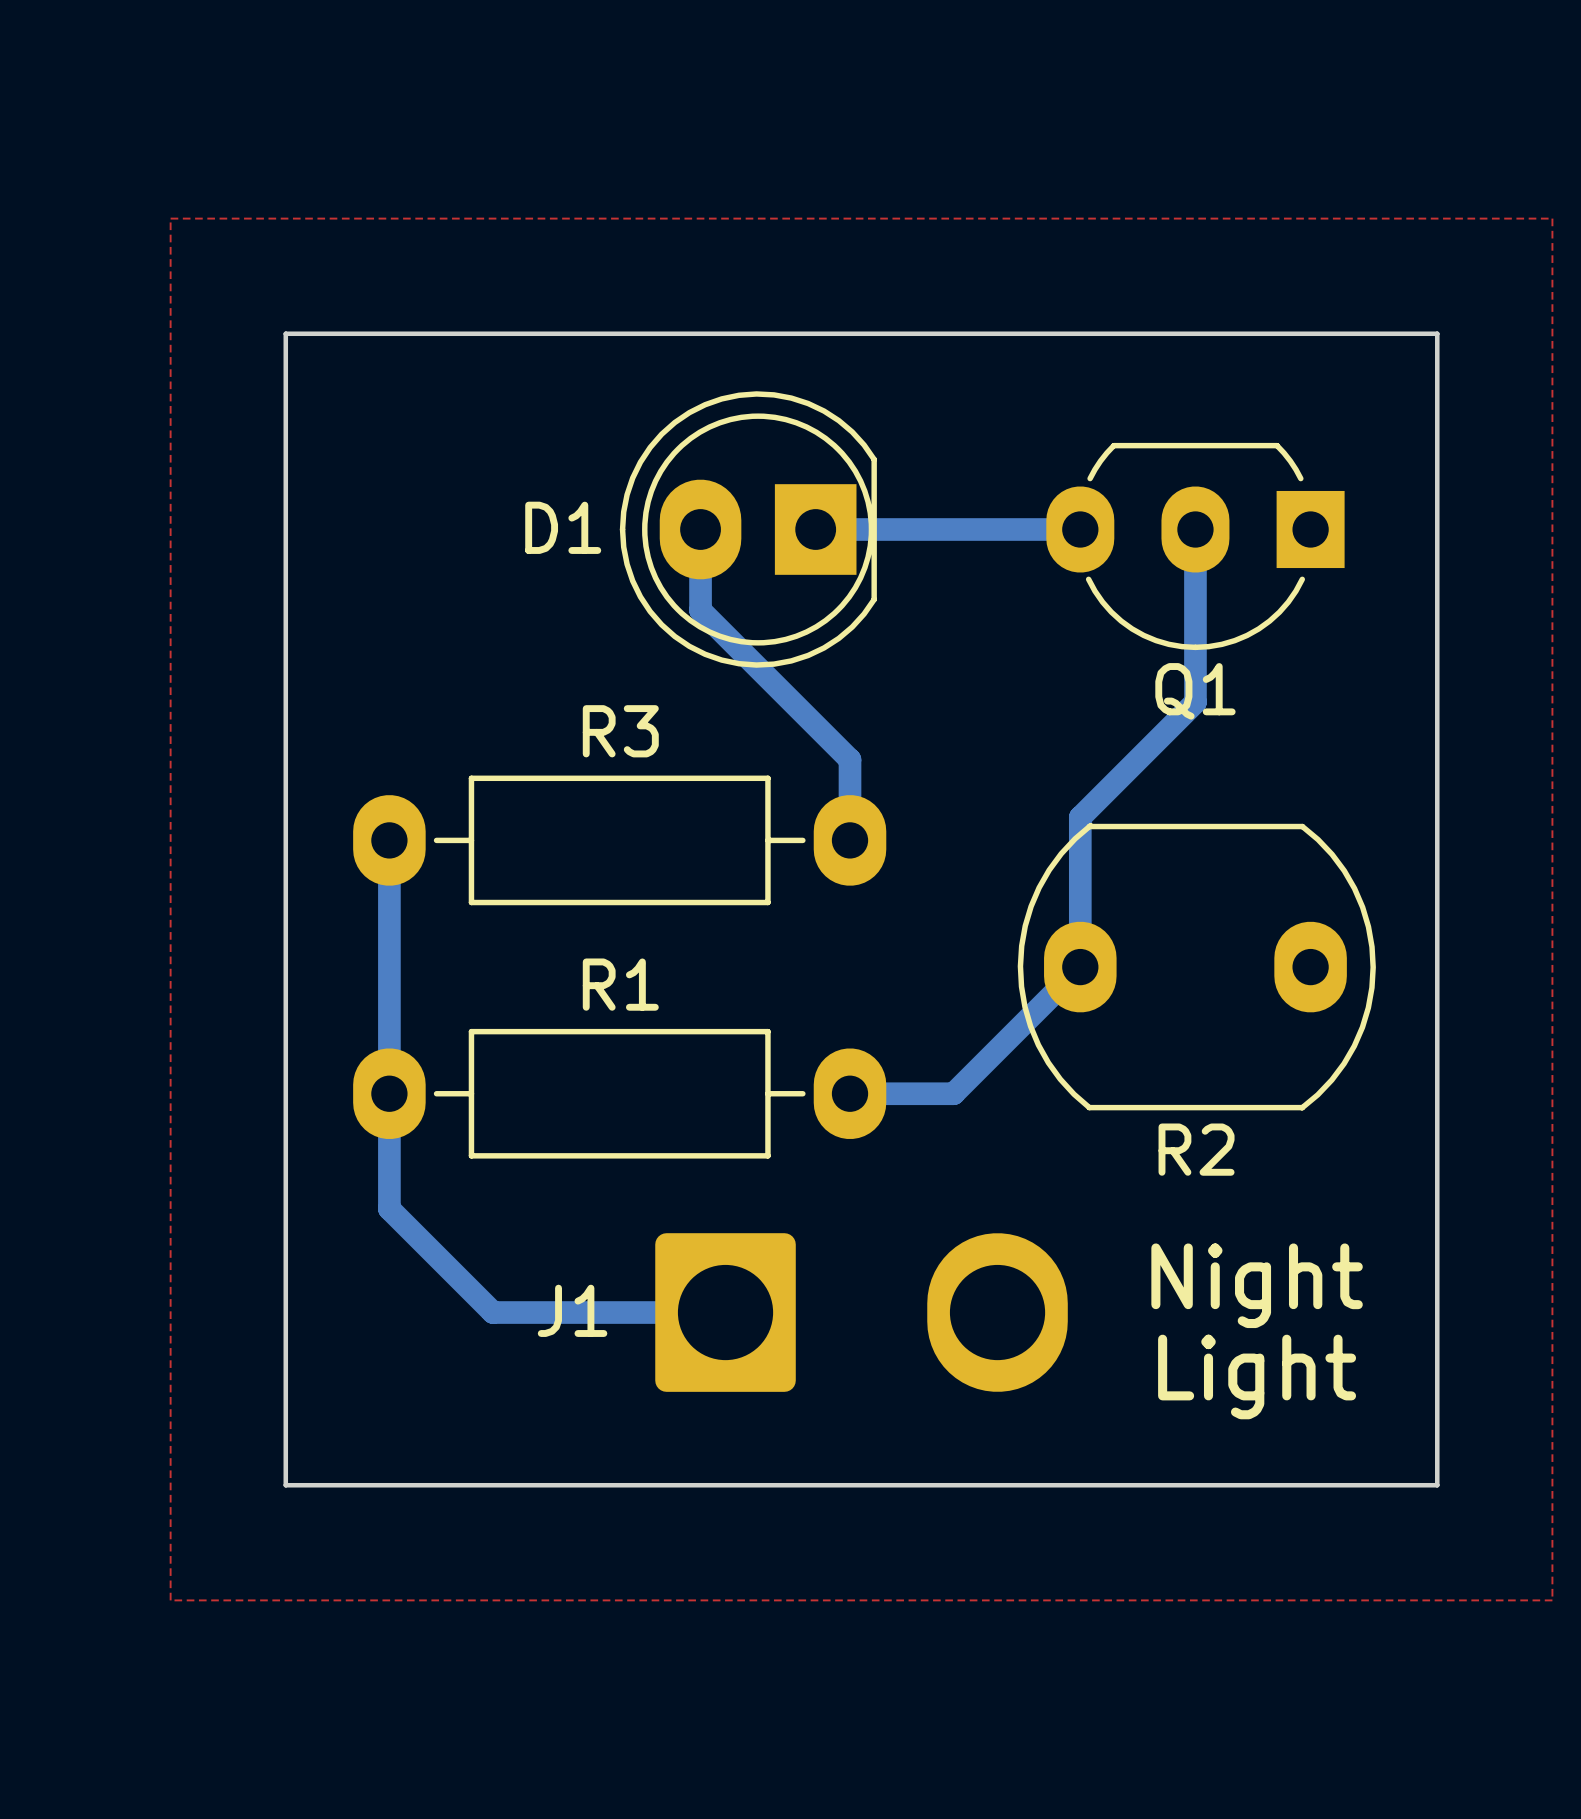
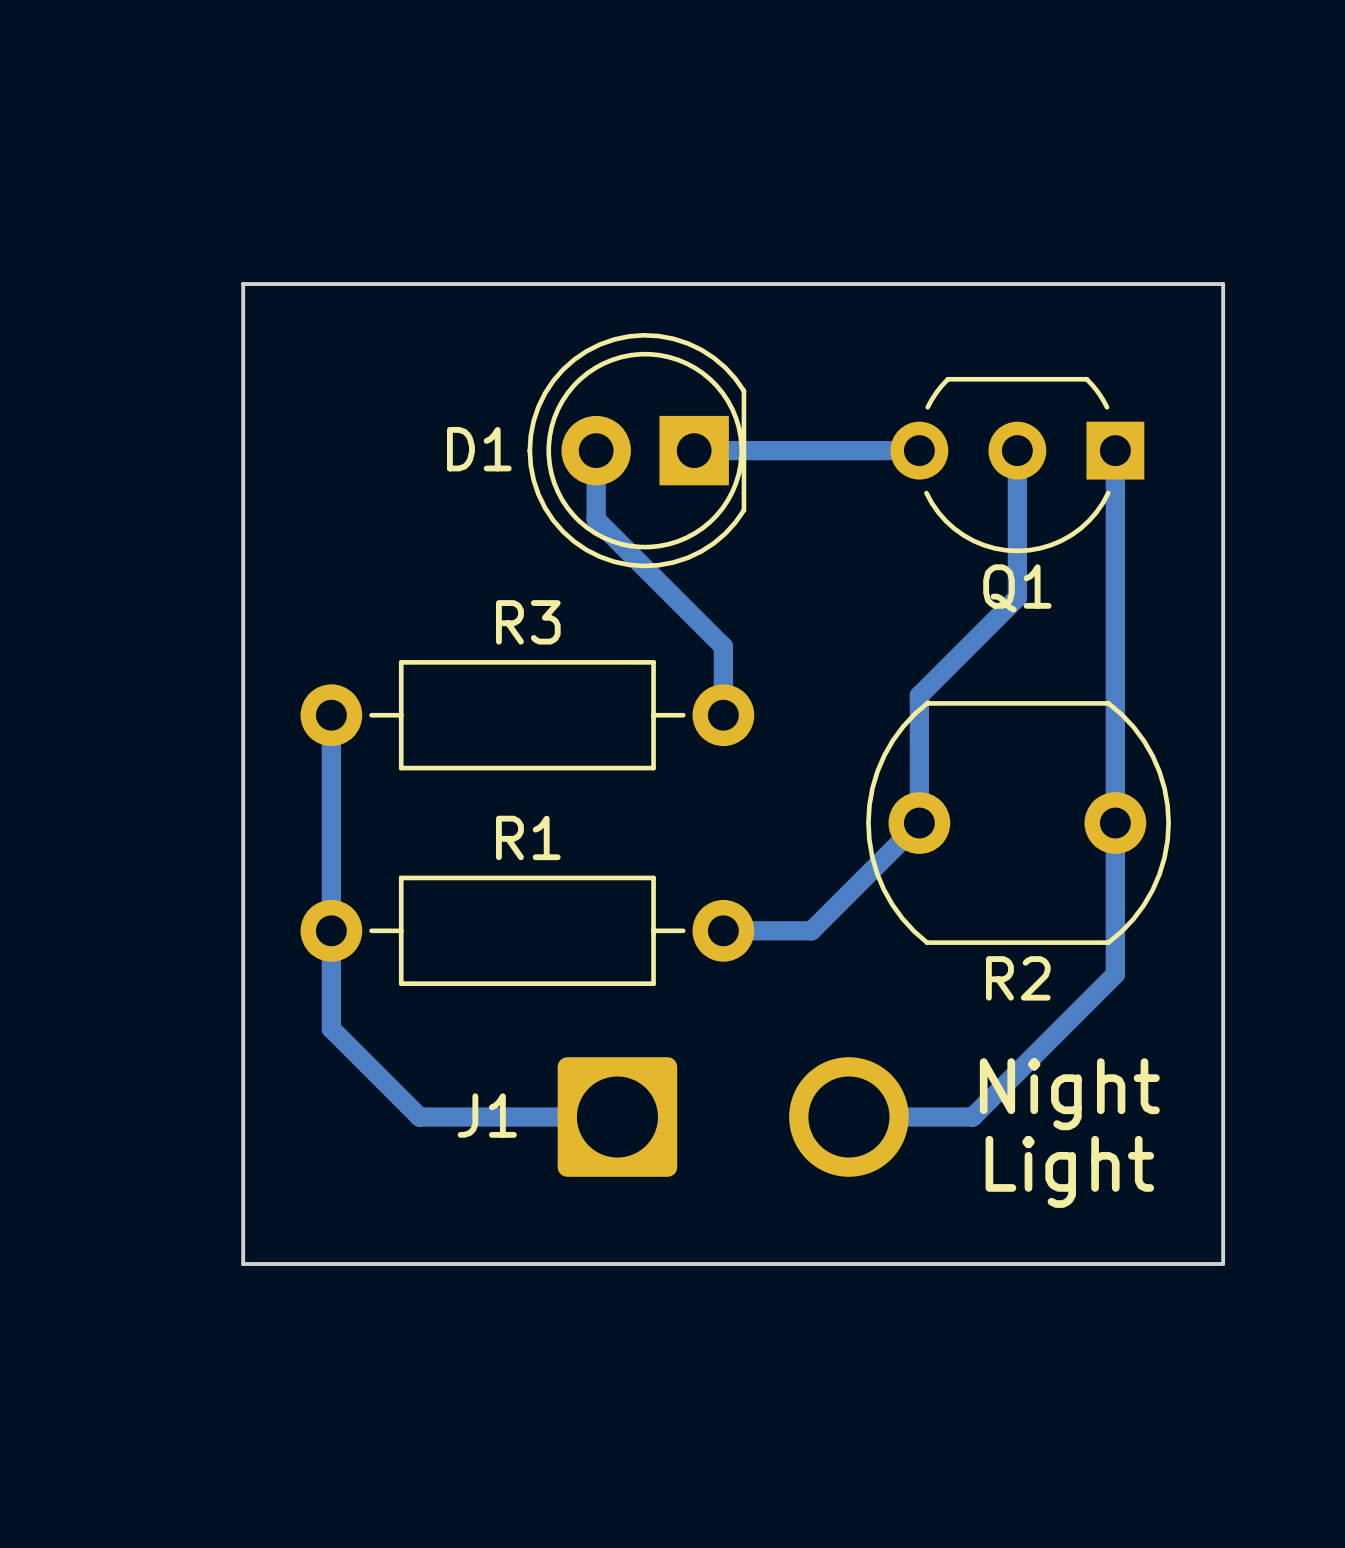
top zone outline: (170, 218) (170, 1600) (1552, 1600) (1552, 218) (170, 218) -> none
D1 footprint: [619, 391, 877, 668] -> [527, 332, 747, 569]
Q1 footprint: [1046, 442, 1345, 651] -> [890, 376, 1145, 554]
bottom track: none -> (1115, 450) (1115, 974) (972, 1117) (848, 1117)
R3 footprint: [353, 775, 887, 906] -> [300, 660, 755, 771]
R2 footprint: [1017, 822, 1376, 1111] -> [866, 700, 1171, 946]
R1 footprint: [353, 1028, 887, 1159] -> [300, 875, 755, 986]
J1 footprint: [655, 1233, 1068, 1392] -> [557, 1057, 909, 1177]

